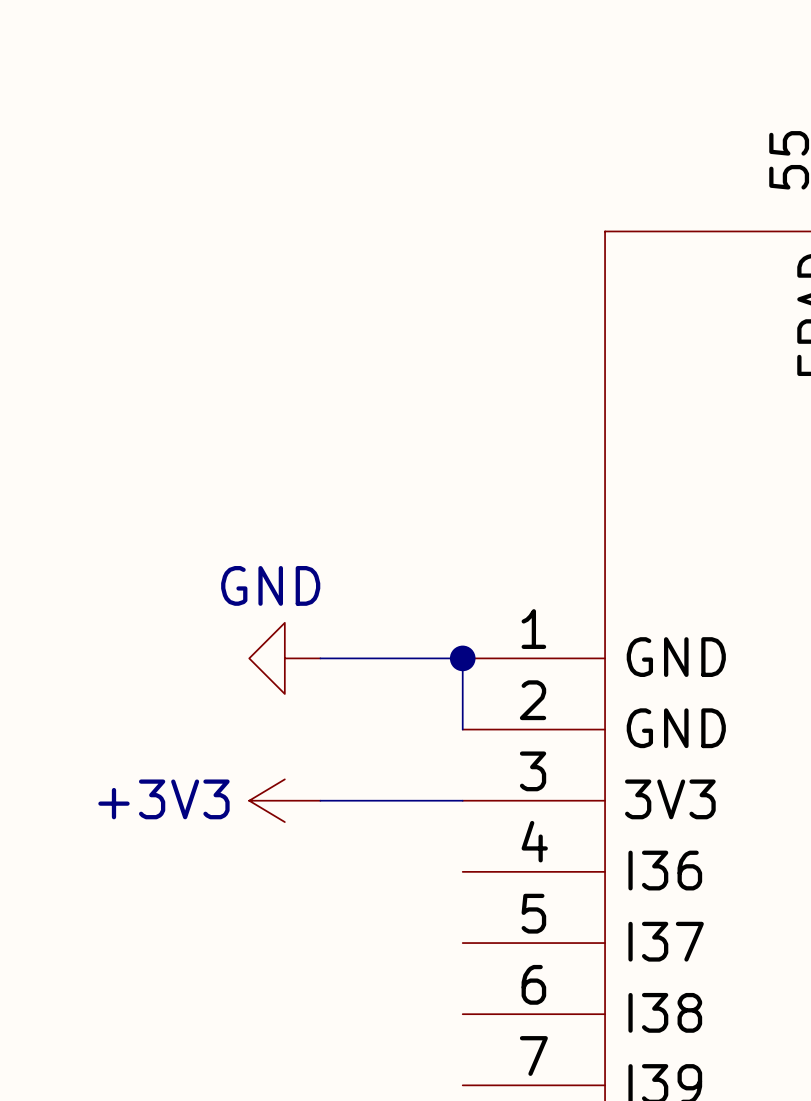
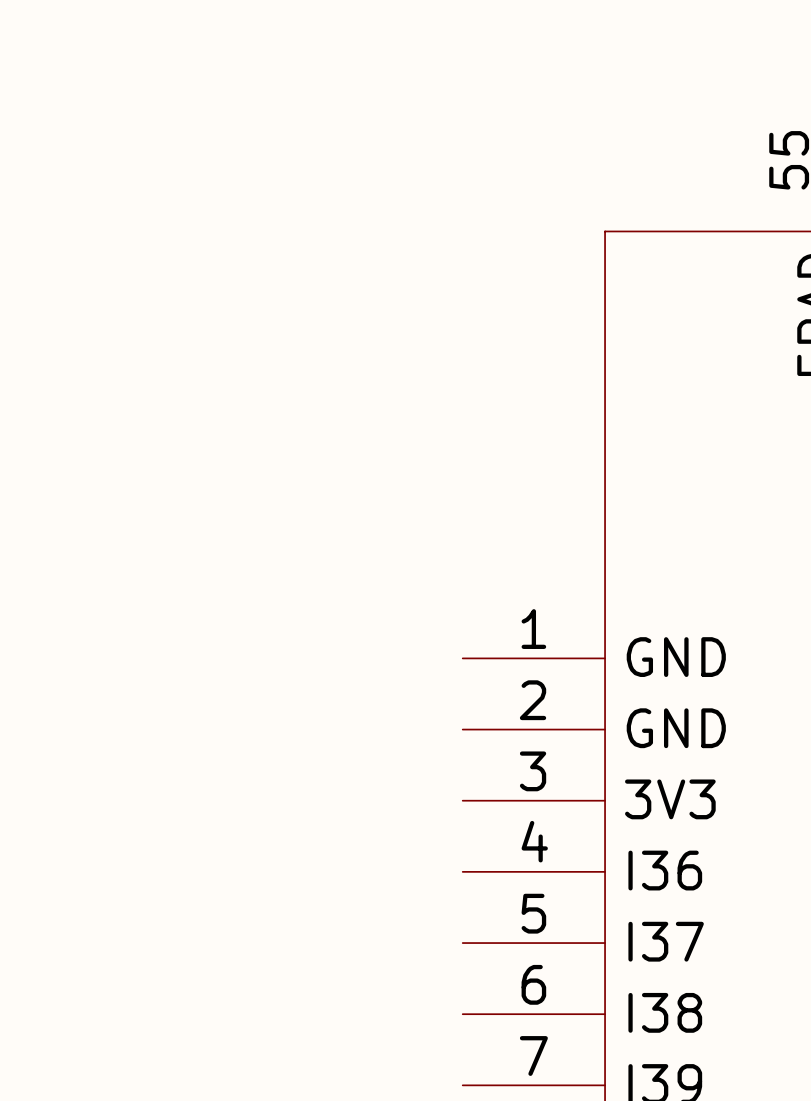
power symbol: GND (284, 658) -> none
wire: (320, 658) (462, 658) (462, 729) -> none
junction: (462, 658) -> none
power symbol: +3V3 (284, 800) -> none
wire: (320, 800) (462, 800) -> none

